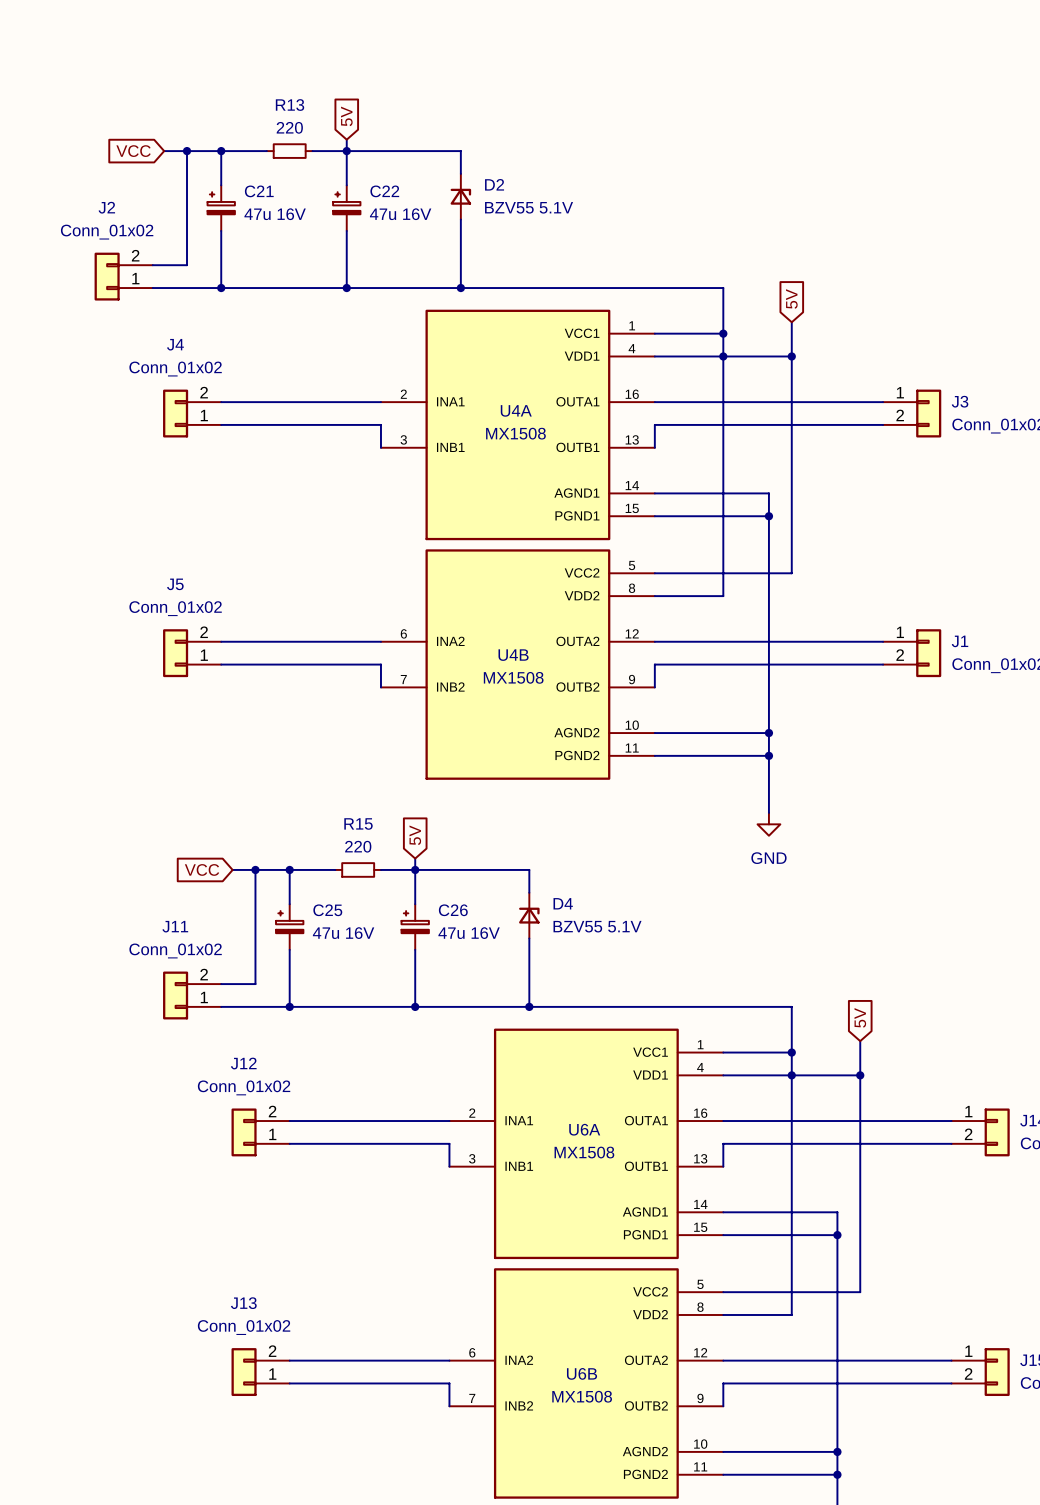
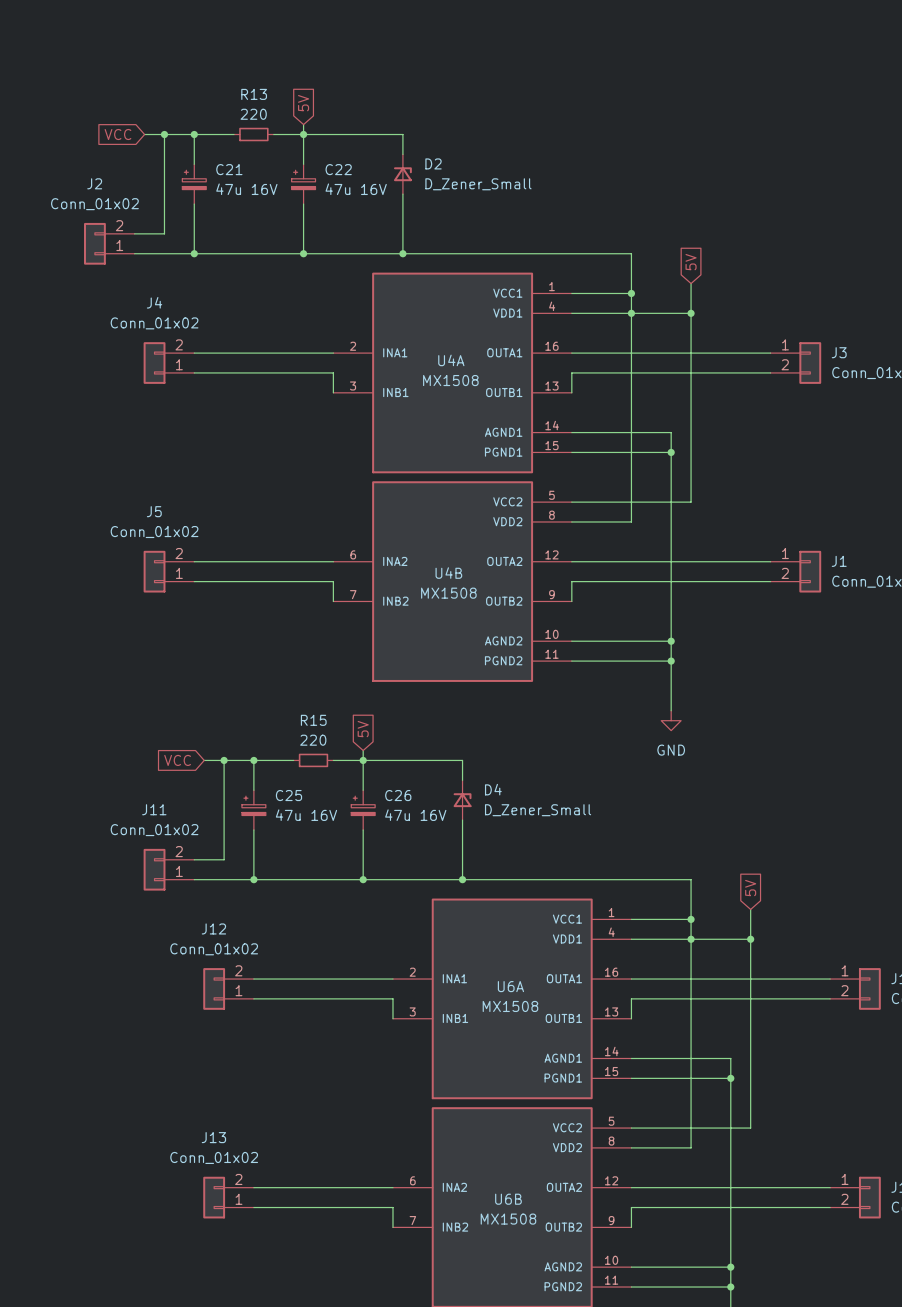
D2 value: BZV55 5.1V (529, 207) -> D_Zener_Small (478, 184)
D4 value: BZV55 5.1V (597, 926) -> D_Zener_Small (538, 810)

